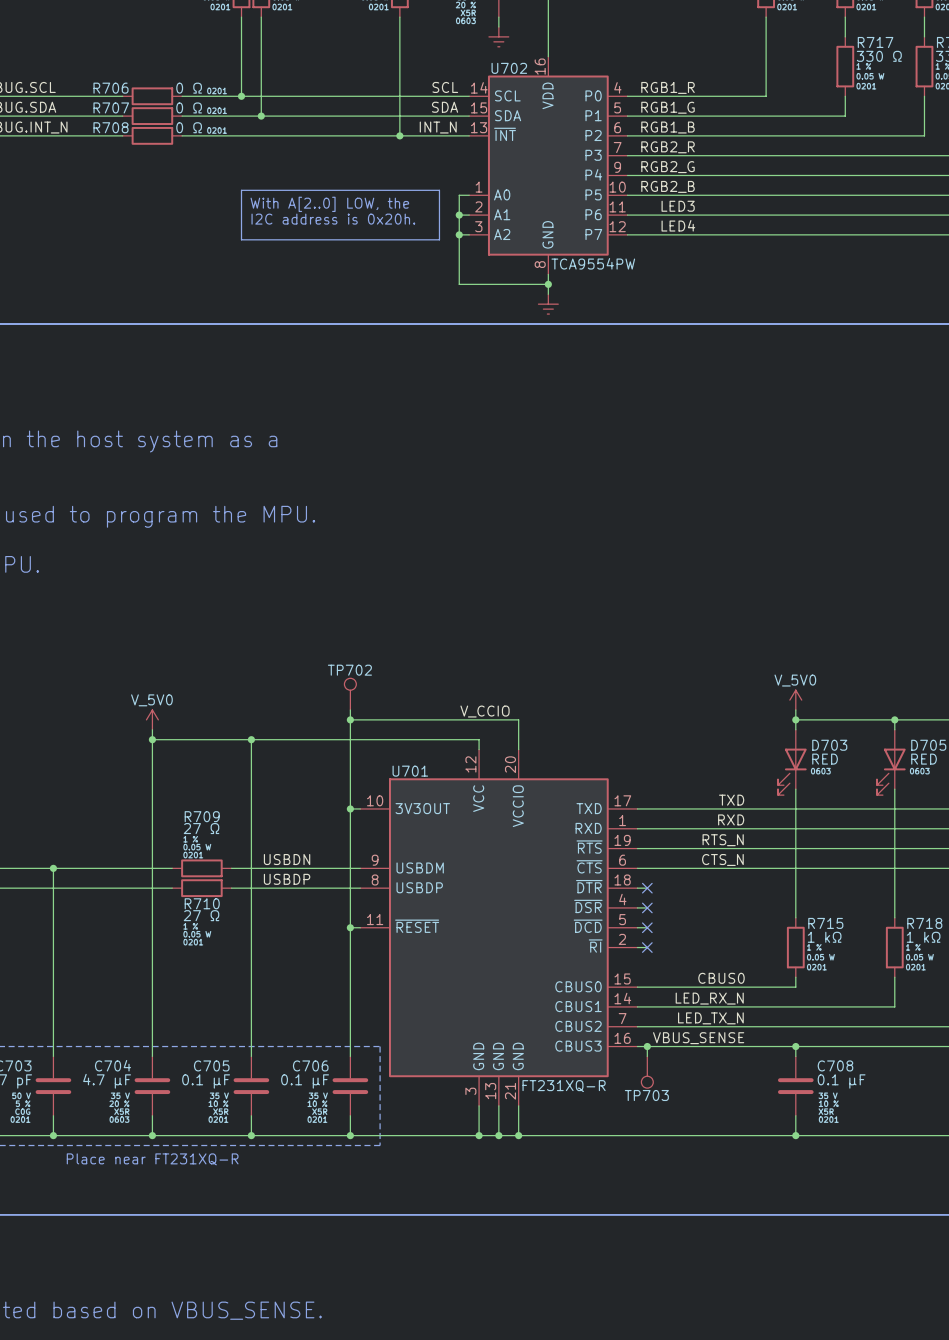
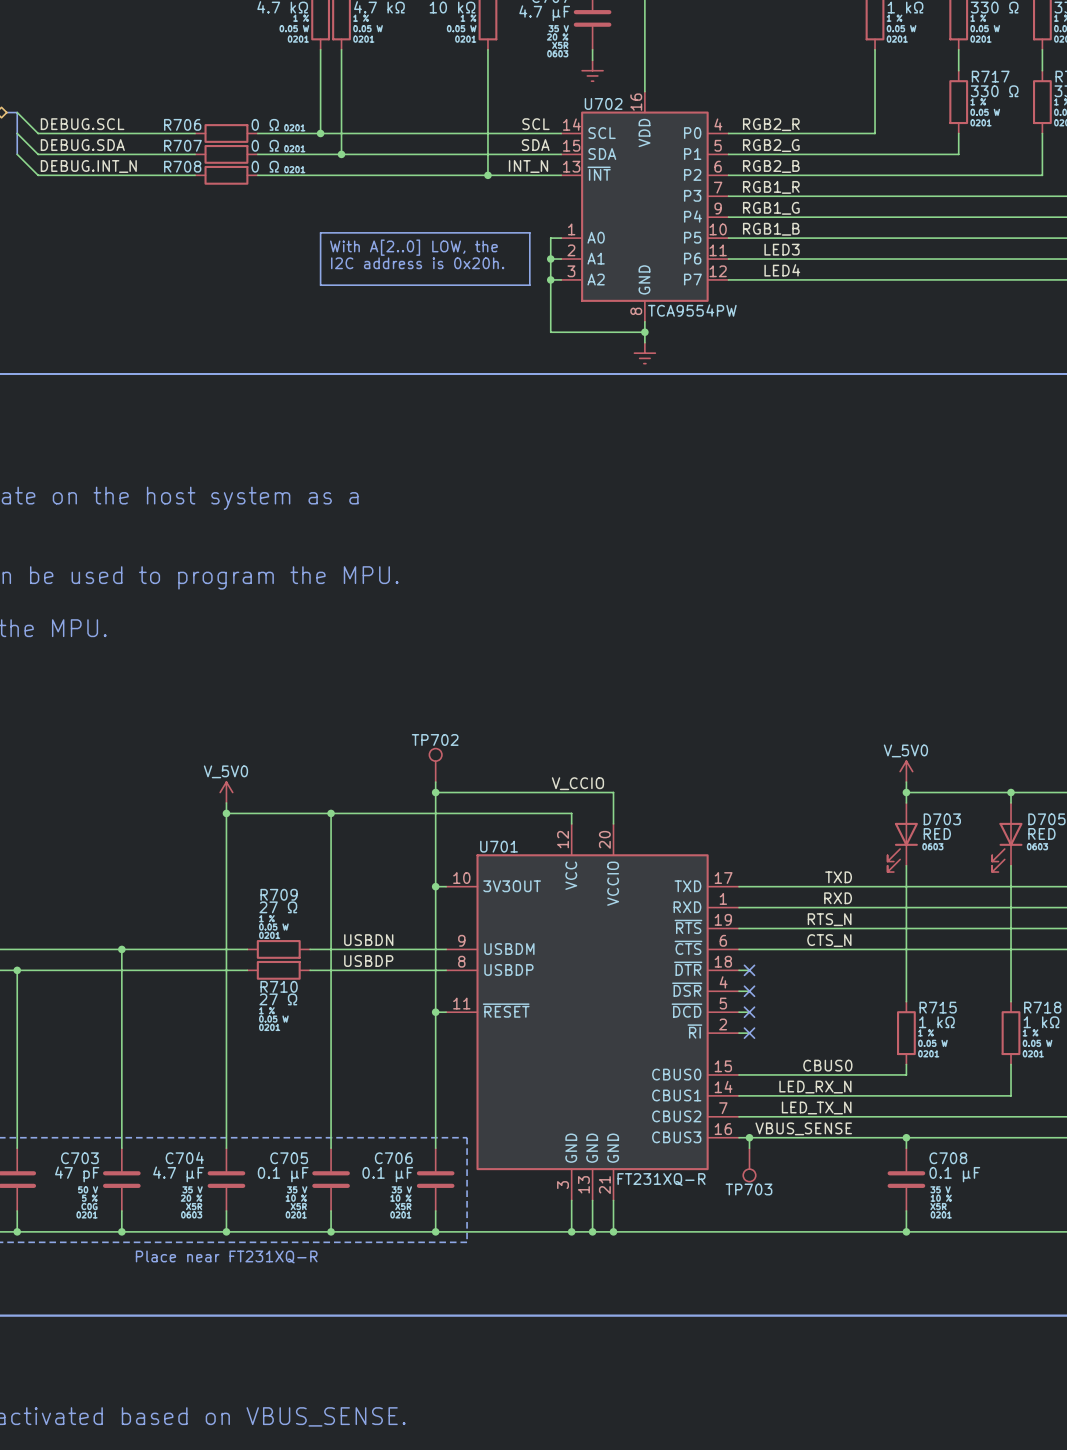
label: RGB1_R (667, 87) -> RGB2_R (771, 124)
label: RGB1_G (667, 107) -> RGB2_G (771, 145)
label: RGB1_B (667, 127) -> RGB2_B (771, 166)
label: RGB2_R (667, 147) -> RGB1_R (771, 187)
label: RGB2_G (667, 167) -> RGB1_G (771, 208)
label: RGB2_B (667, 186) -> RGB1_B (771, 229)

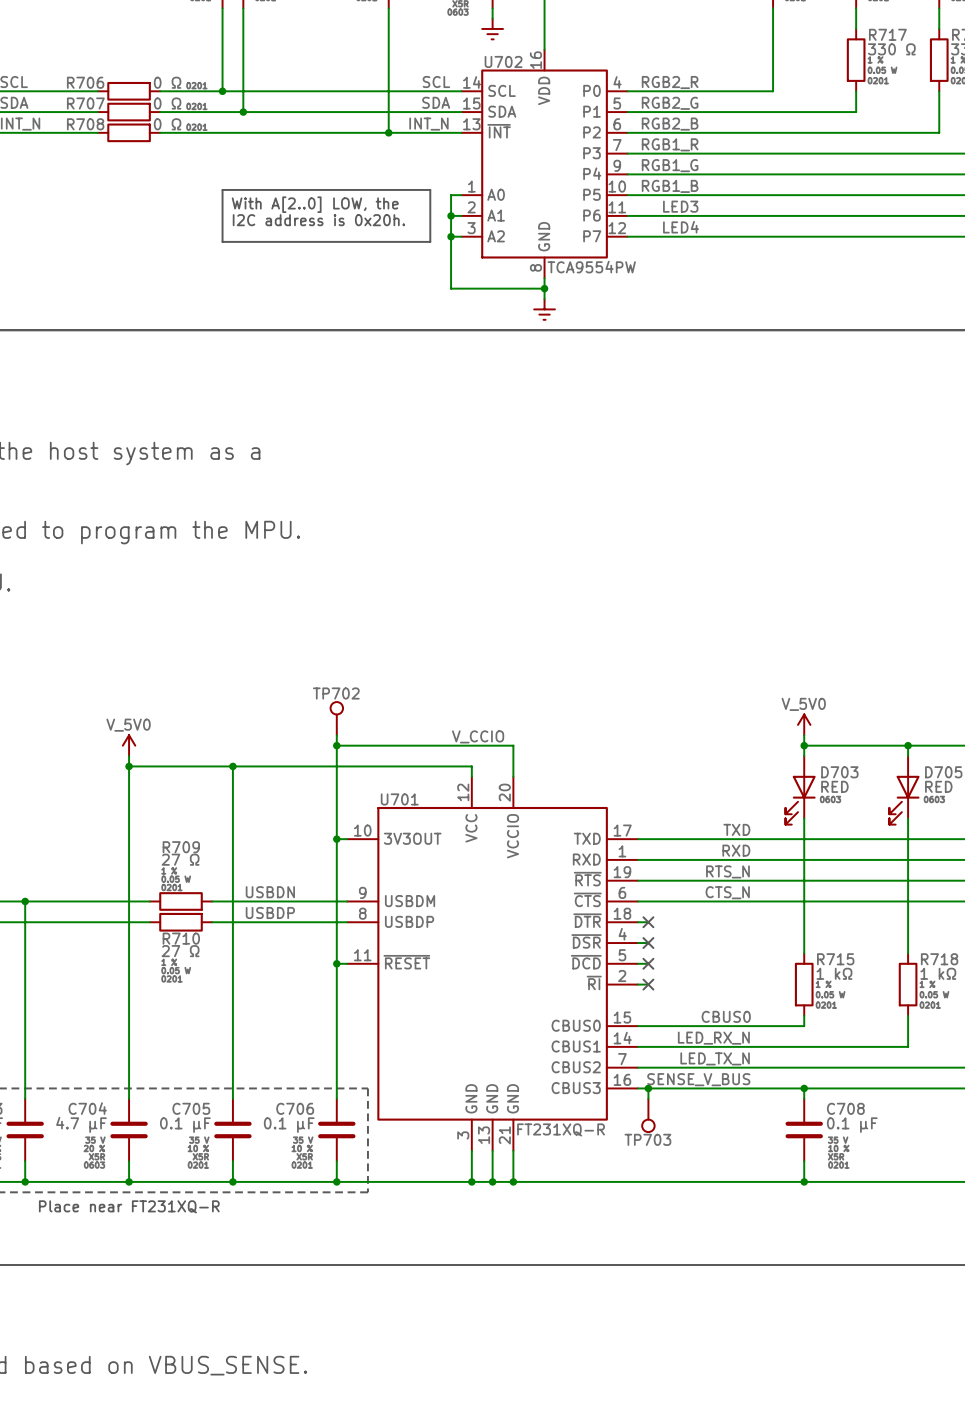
label: VBUS_SENSE (803, 1128) -> SENSE_V_BUS (698, 1079)

